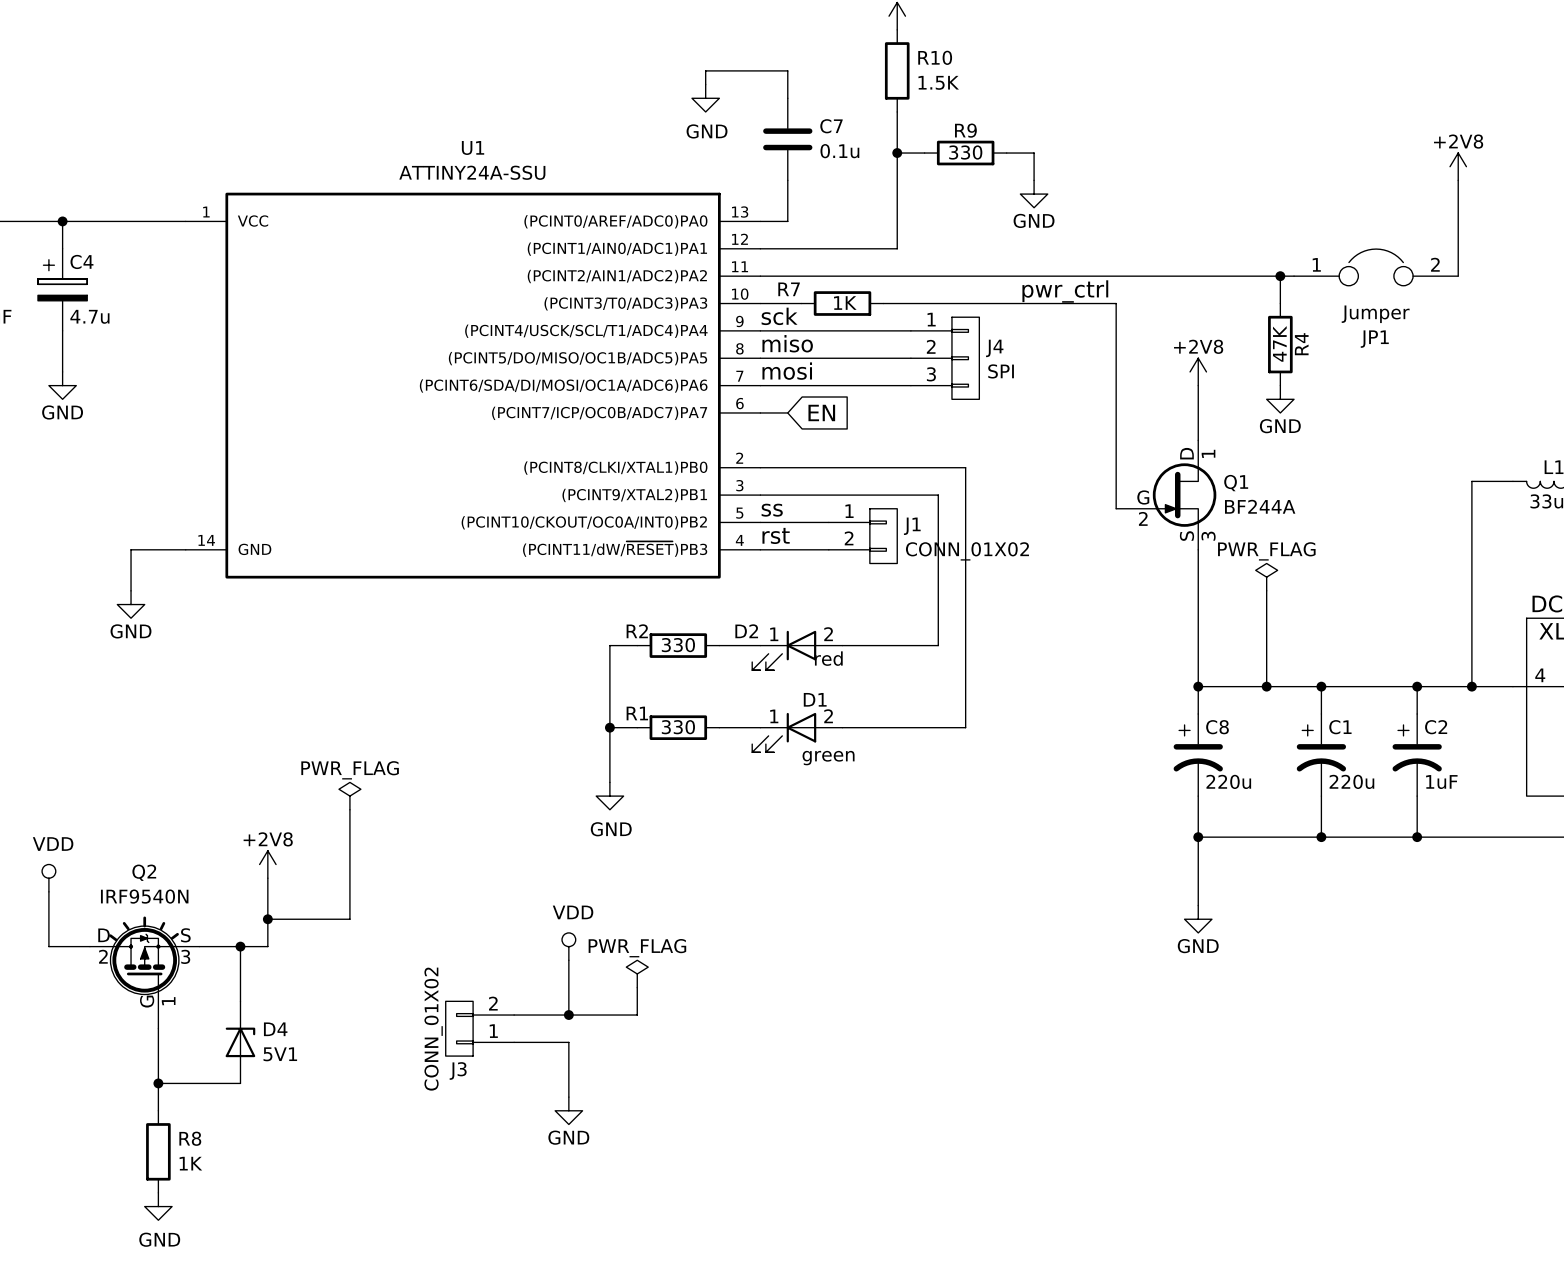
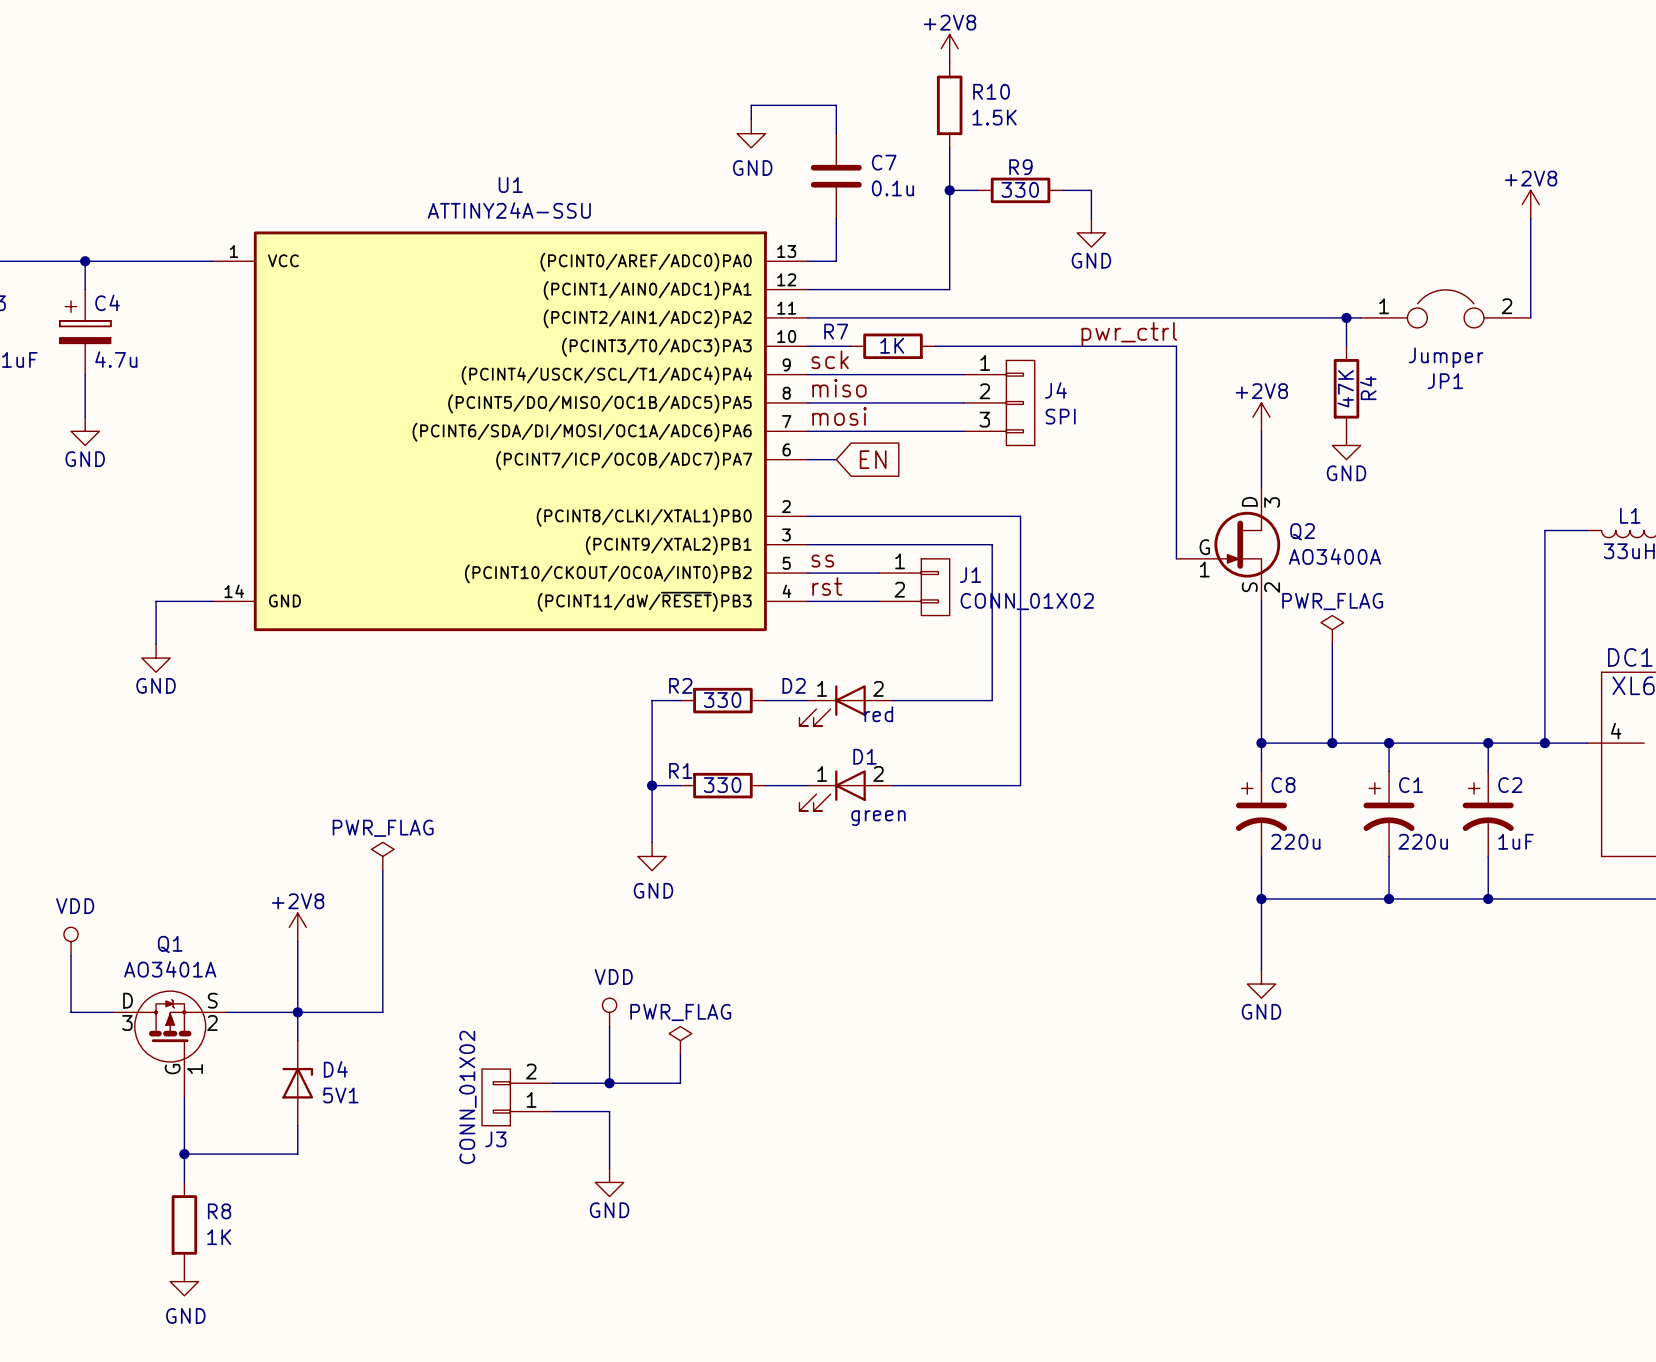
Q1 symbol: [1116, 440, 1217, 550] -> [113, 991, 227, 1098]
Q1 name position: Q1 (1236, 483) -> Q1 (170, 944)
Q1 value: BF244A (1260, 506) -> AO3401A (170, 969)
Q2 name position: Q2 (144, 872) -> Q2 (1302, 531)
Q2 value: IRF9540N (144, 896) -> AO3400A (1334, 556)
Q2 symbol: [89, 916, 200, 1029] -> [1176, 488, 1281, 602]
wire: (267, 919) (349, 919) -> (297, 1040) (297, 1012) (382, 1012) (382, 984)
junction: (267, 919) -> none
wire: (240, 946) (240, 1001) -> none
junction: (240, 946) -> none
junction: none -> (297, 1012)
D4 position: (240, 1042) -> (297, 1083)
wire: none -> (297, 1125) (297, 1154) (269, 1154)

